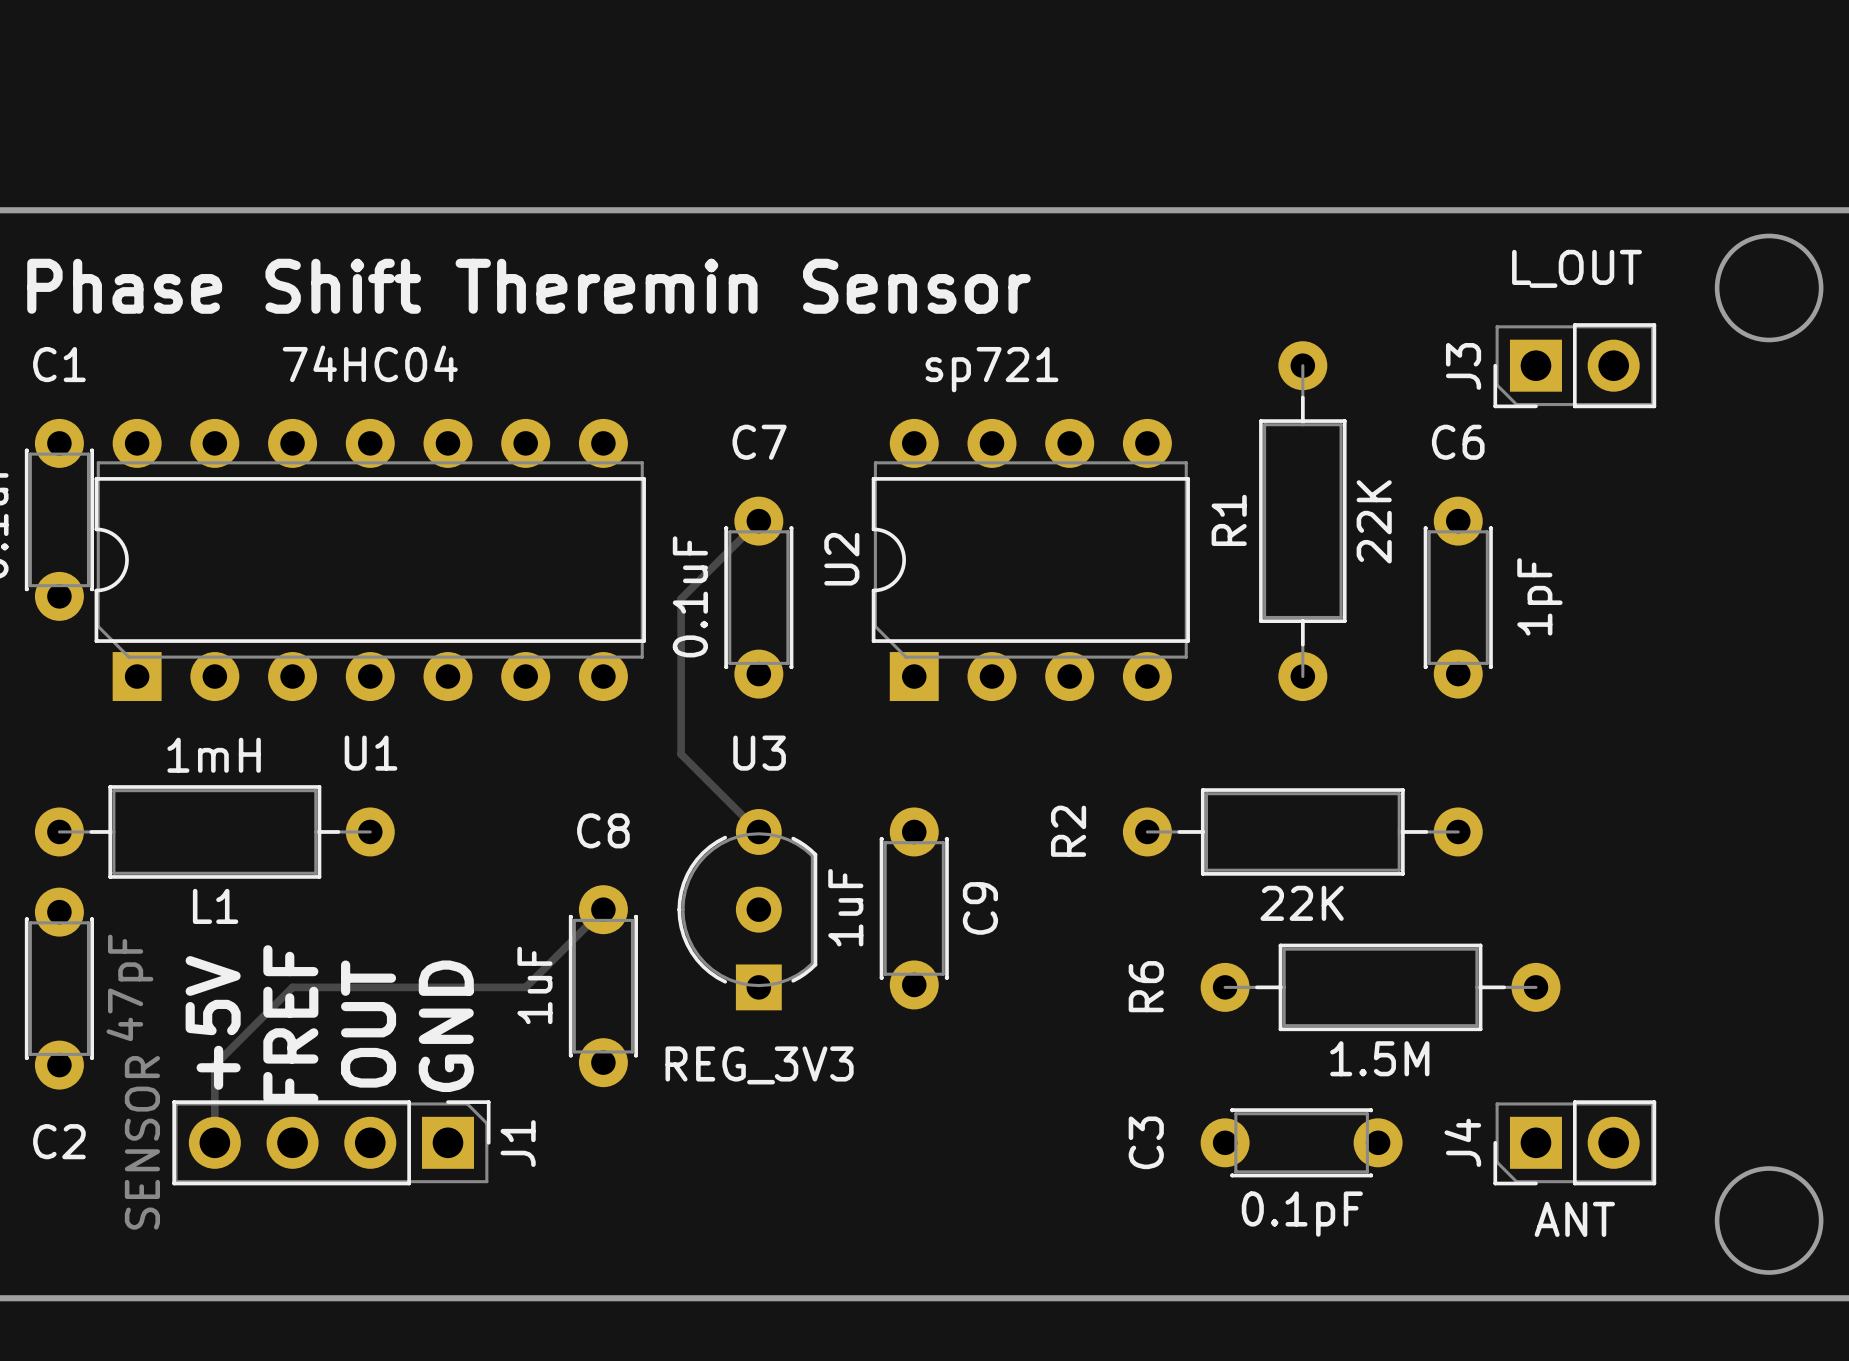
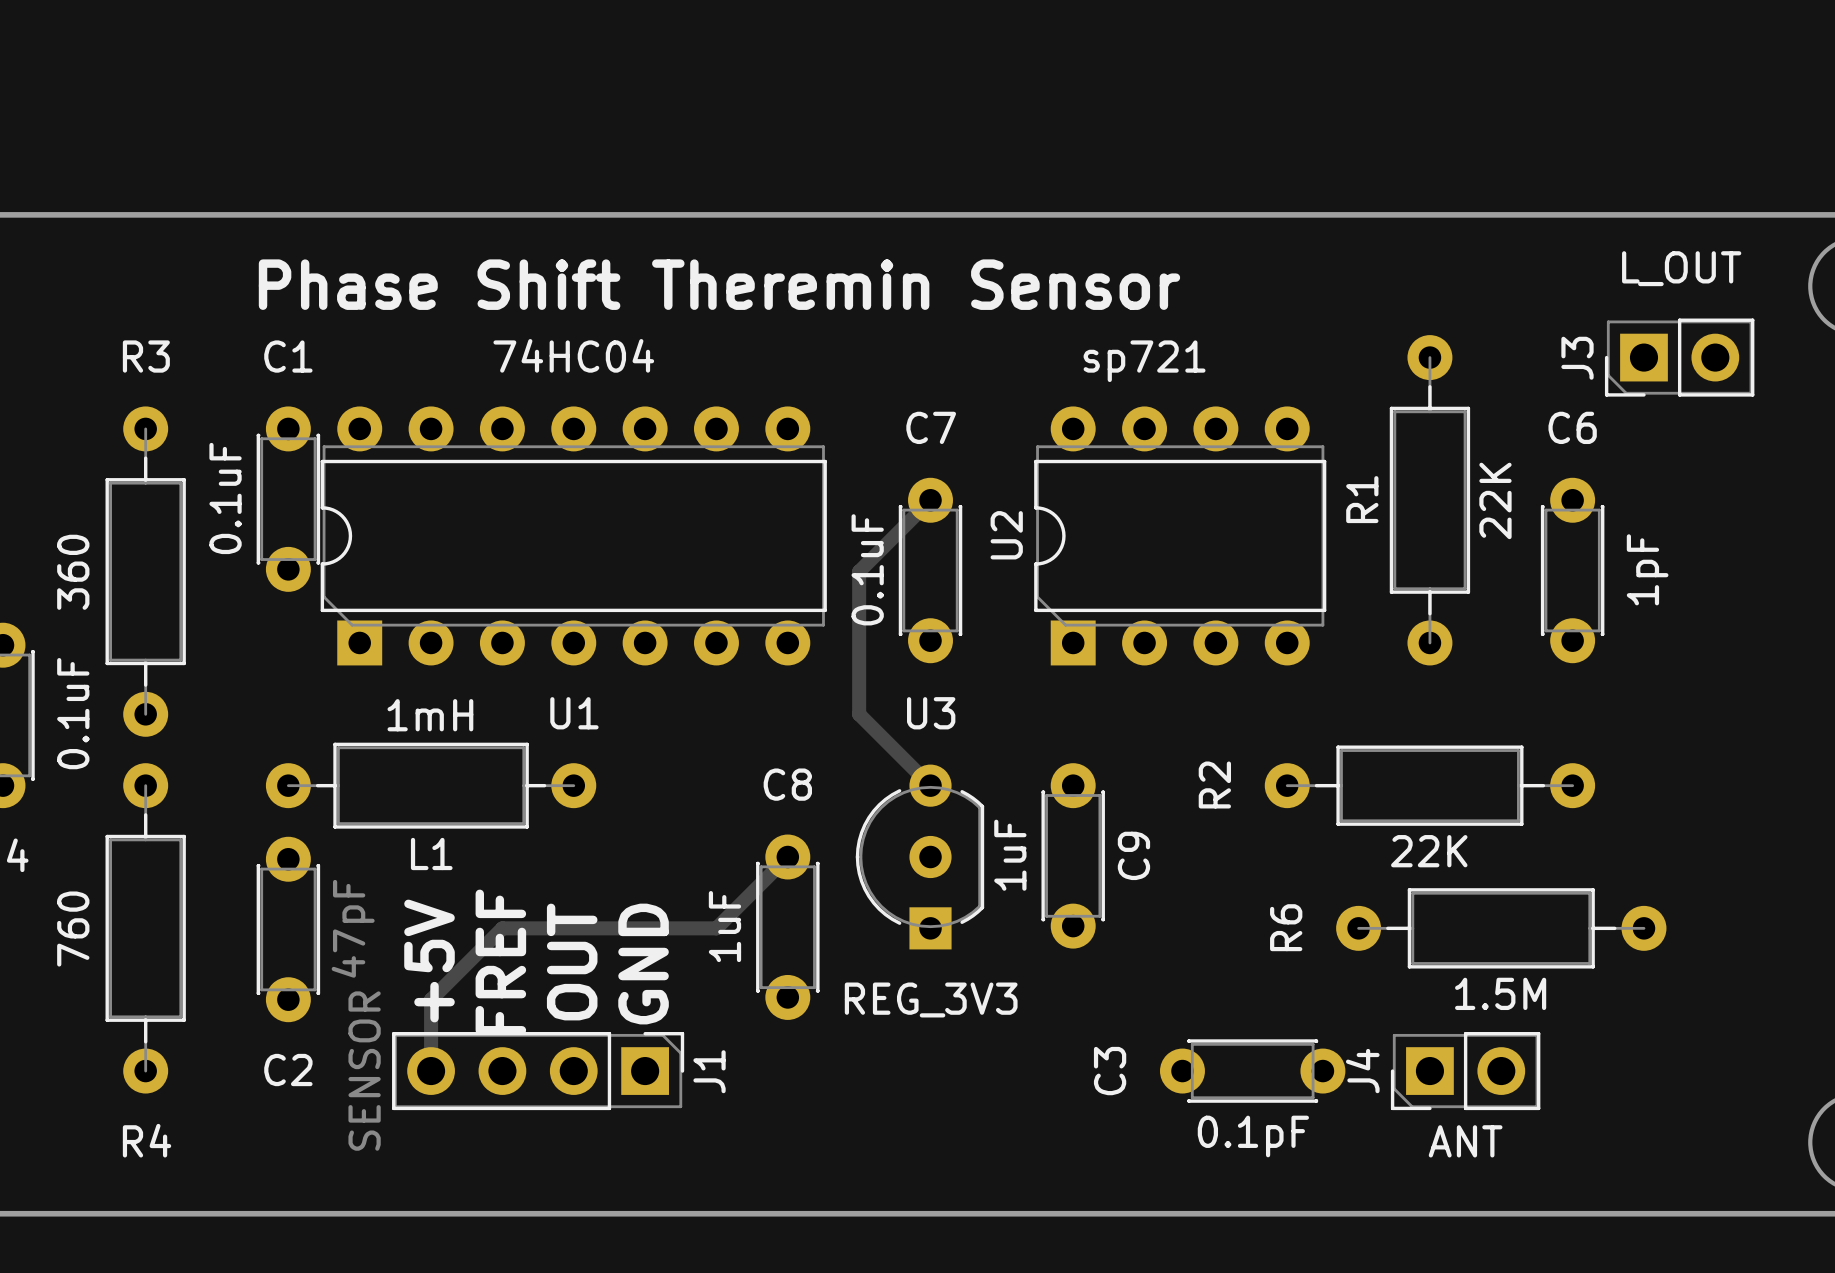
track width: thin (758, 521) (681, 598) (681, 754) (758, 831) -> thick (930, 500) (859, 571) (859, 714) (930, 785)
track width: thin (603, 909) (525, 987) (292, 987) (214, 1065) (214, 1142) -> thick (787, 857) (716, 928) (502, 928) (431, 999) (431, 1071)
C3 position: (1301, 1142) -> (1252, 1071)
J4 position: (1574, 1142) -> (1465, 1071)

